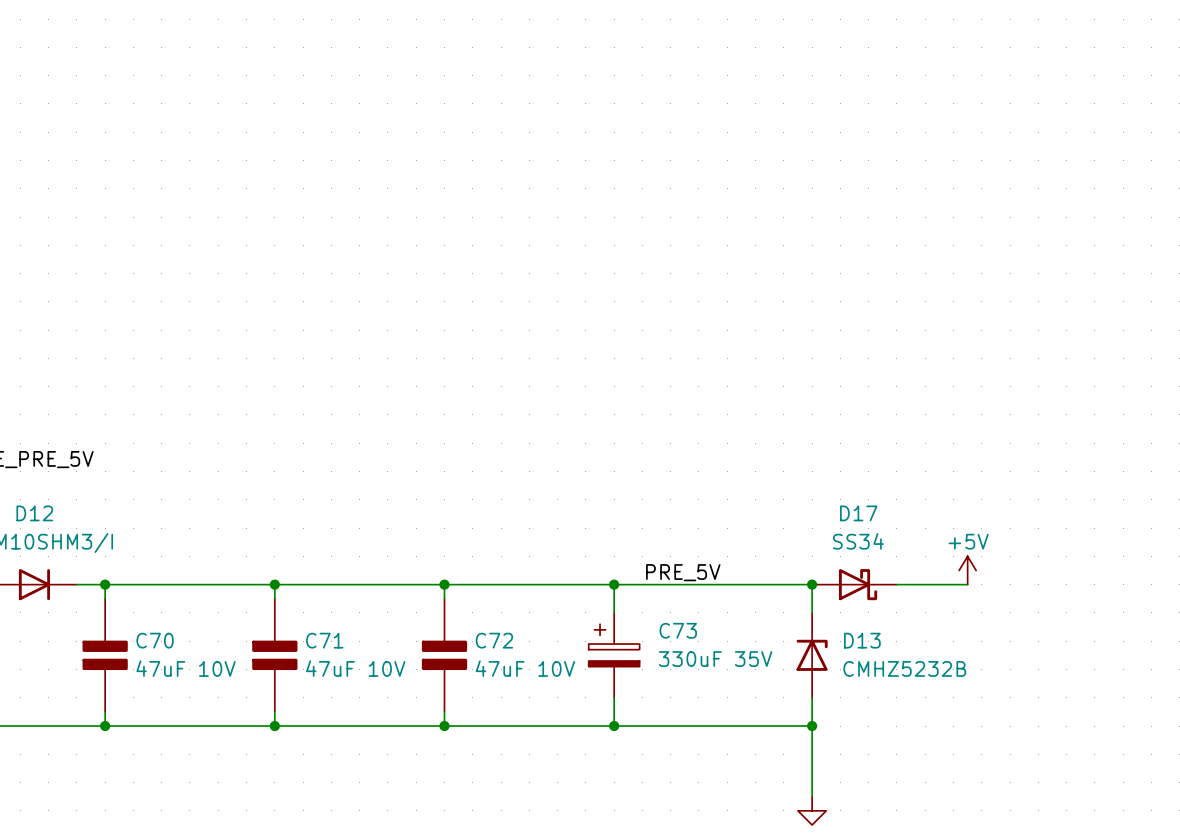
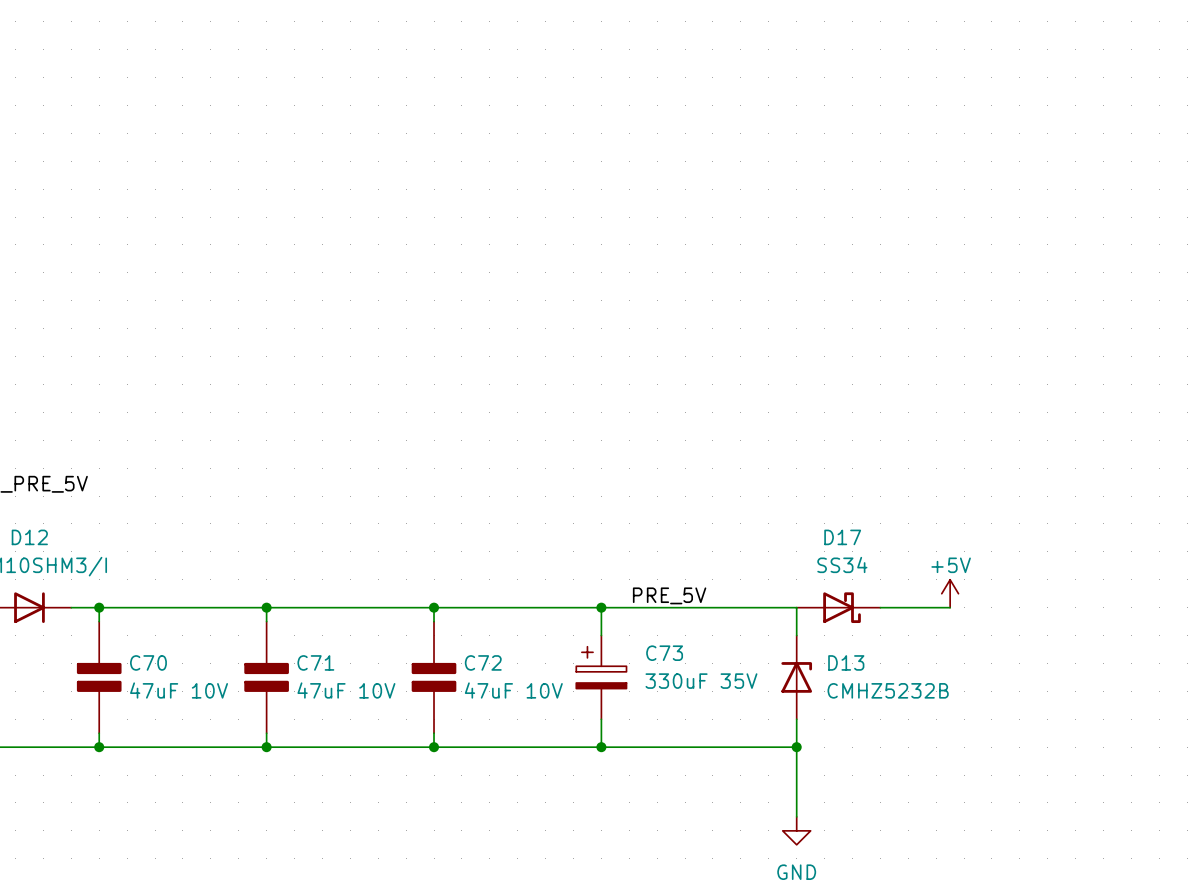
junction: (812, 584) -> none

